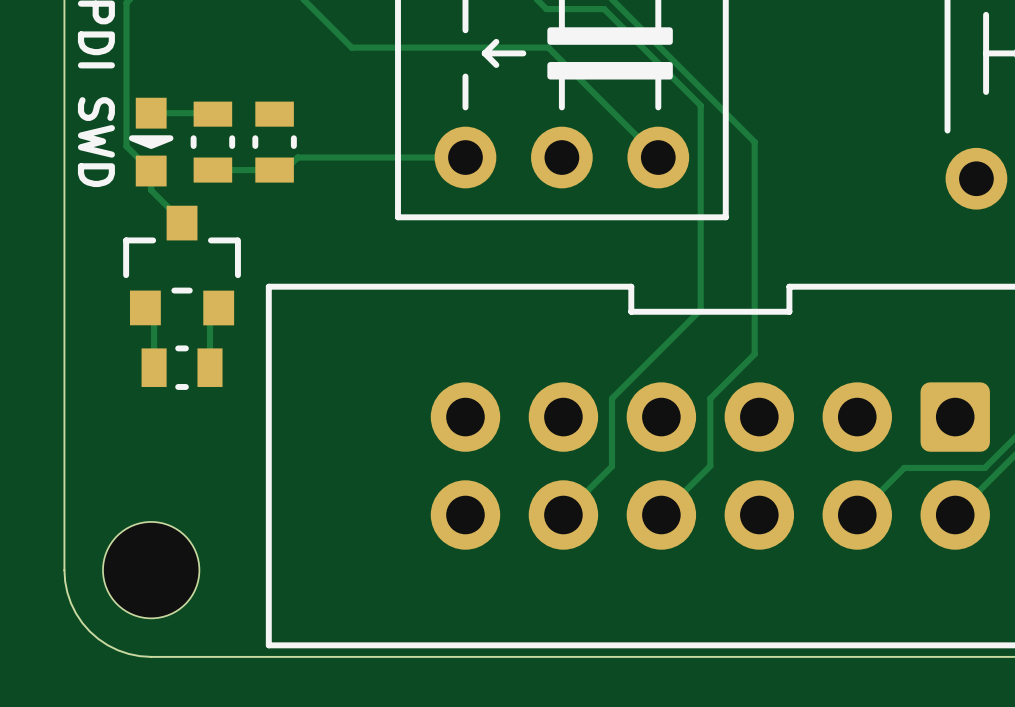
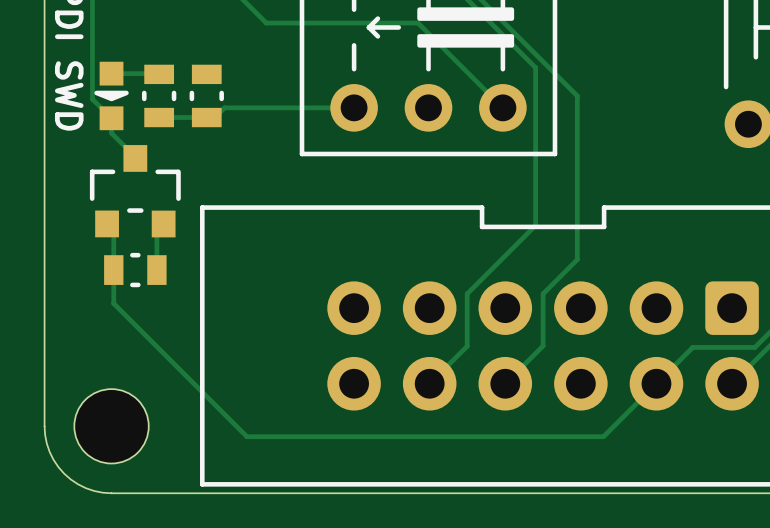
track: none -> (113, 270) (113, 303) (246, 436) (603, 436) (656, 383)

